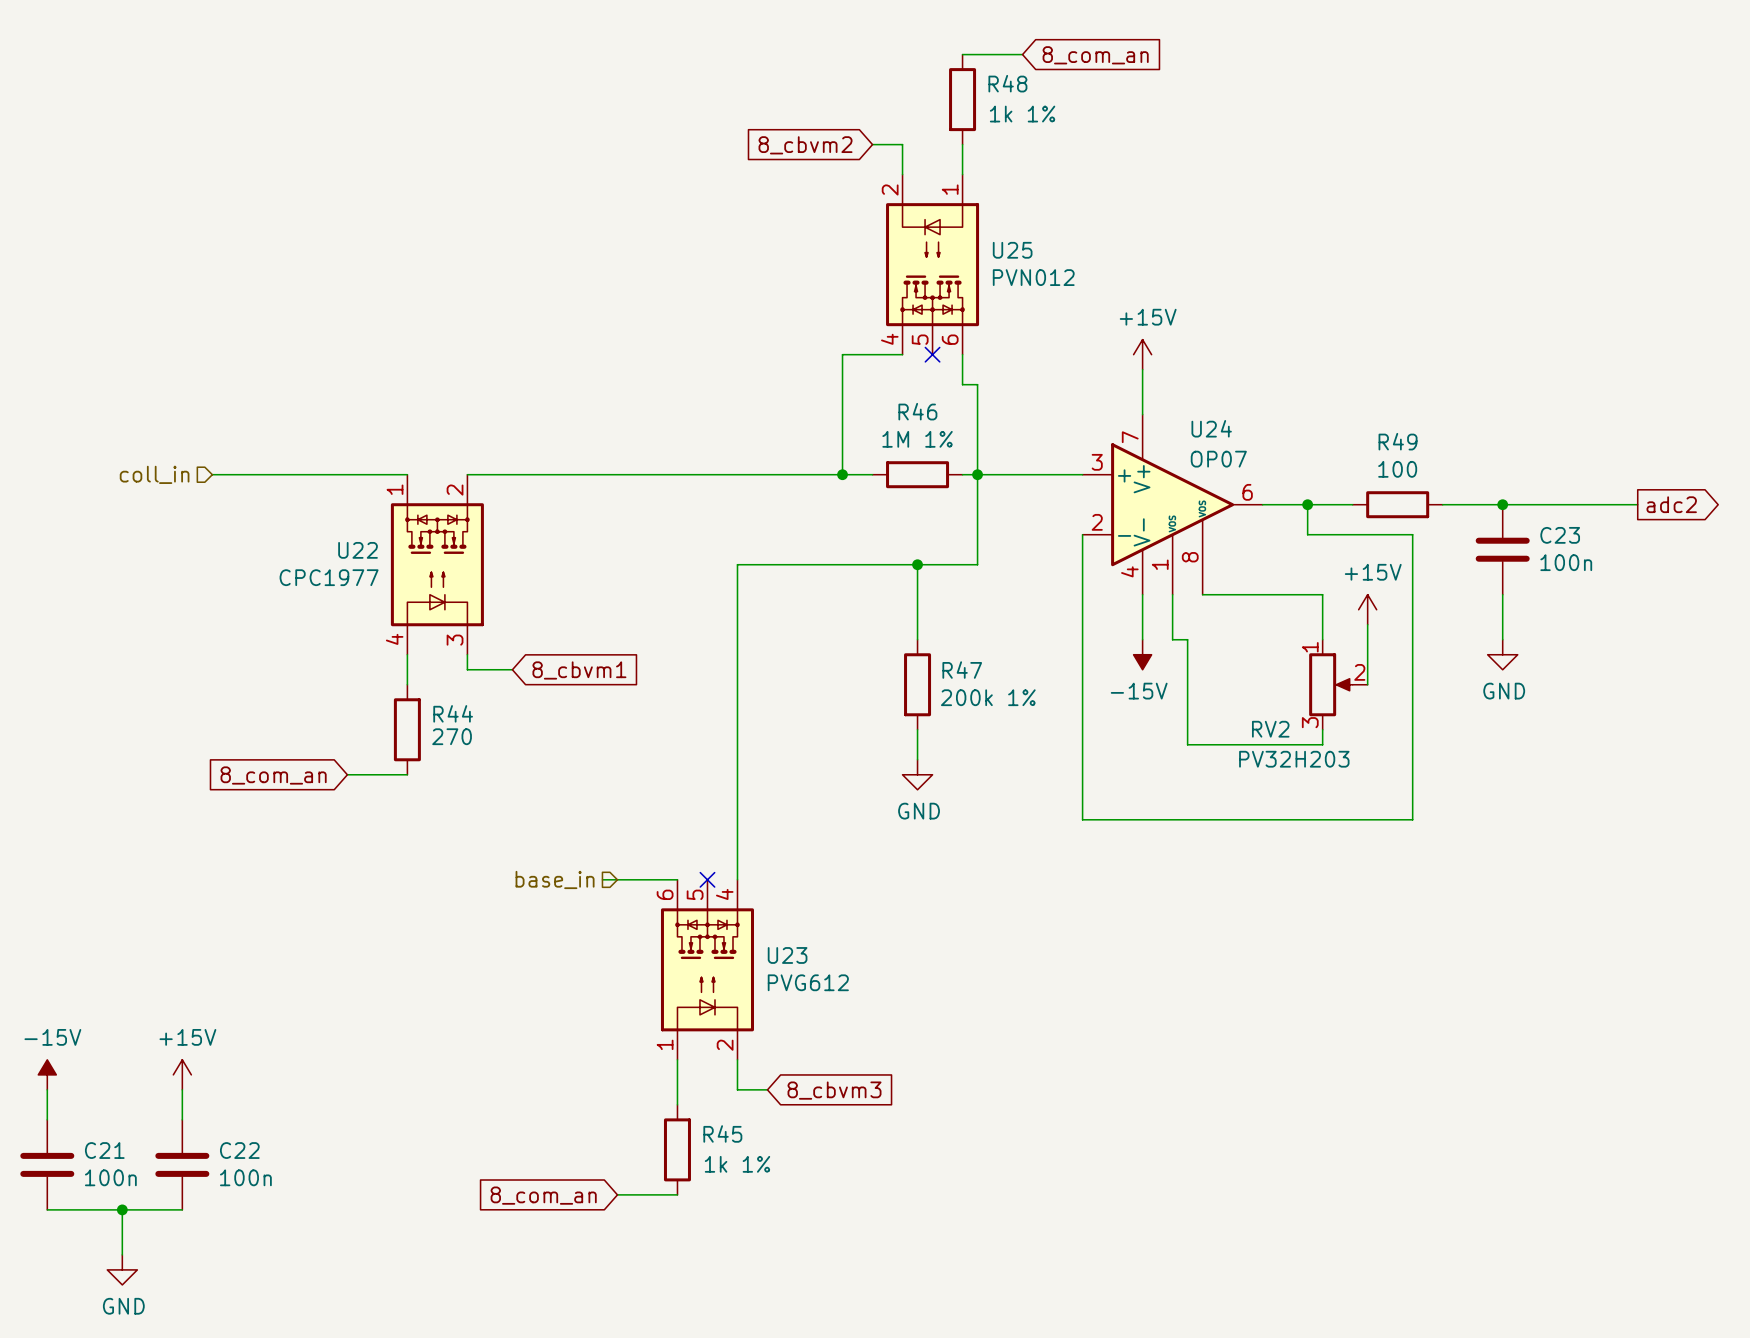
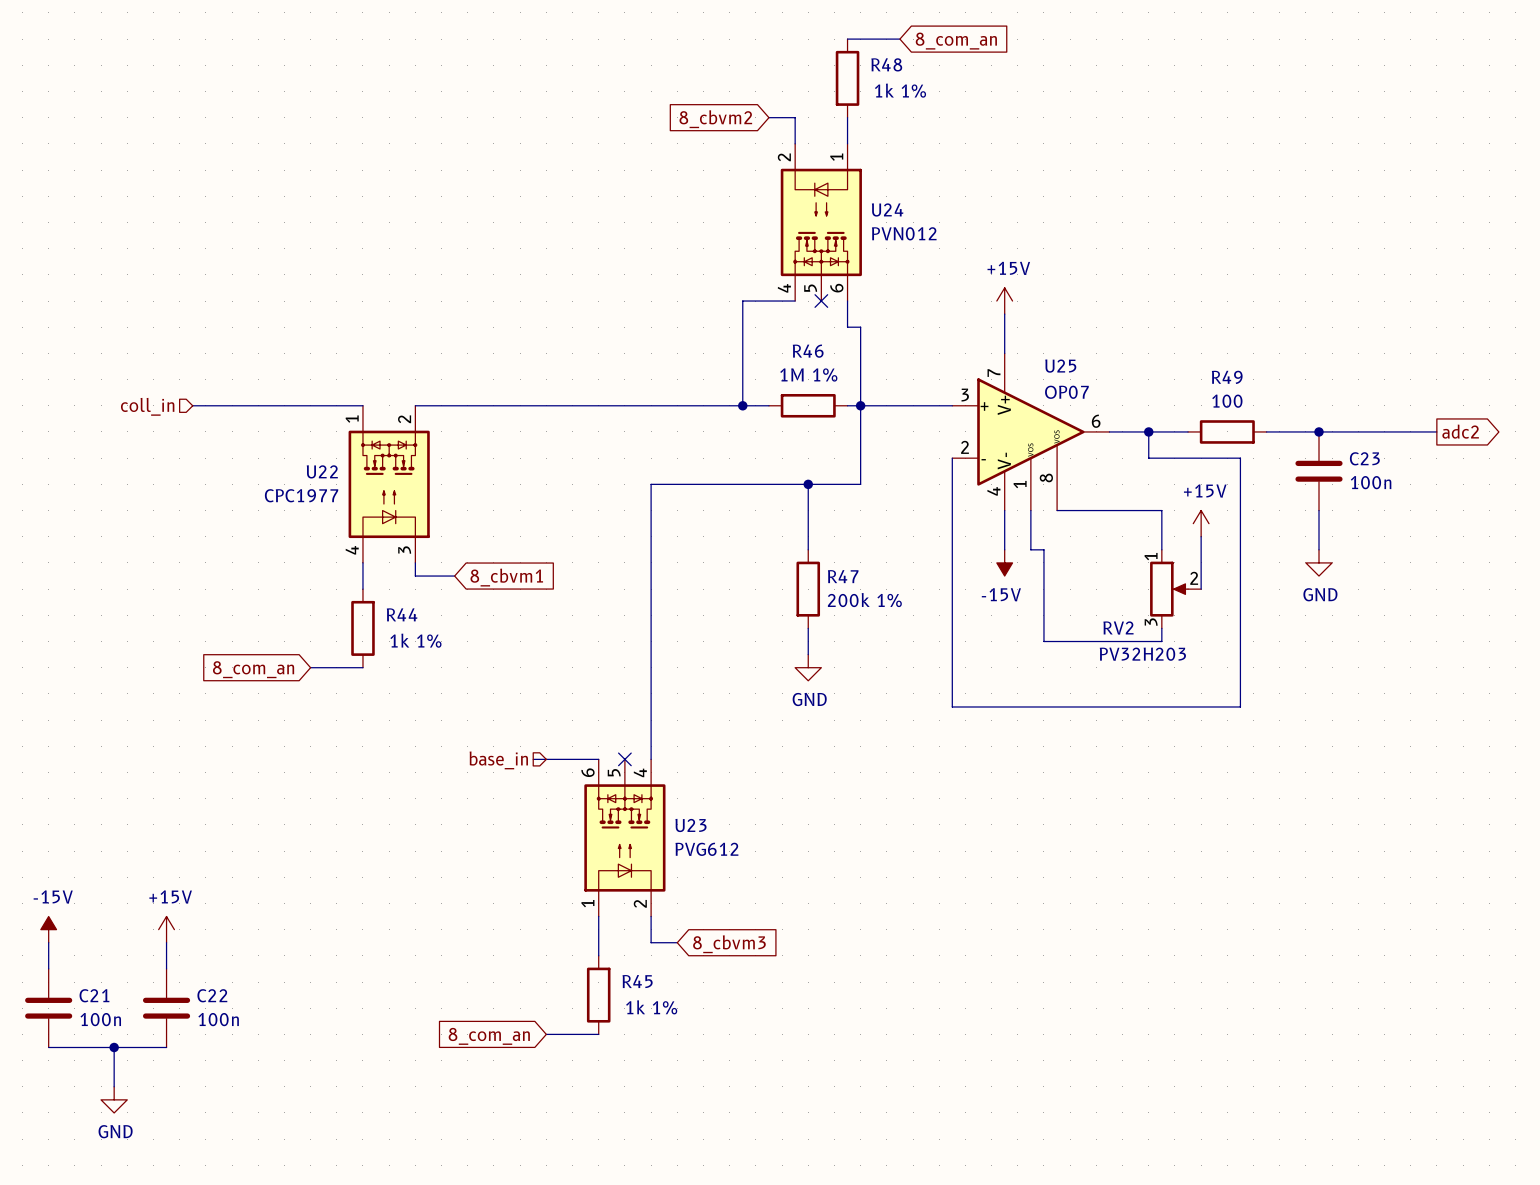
U25 name: U25 (1012, 250) -> U24 (887, 209)
U24 name: U24 (1211, 428) -> U25 (1060, 366)
R44 value: 270 (452, 736) -> 1k 1% (415, 640)

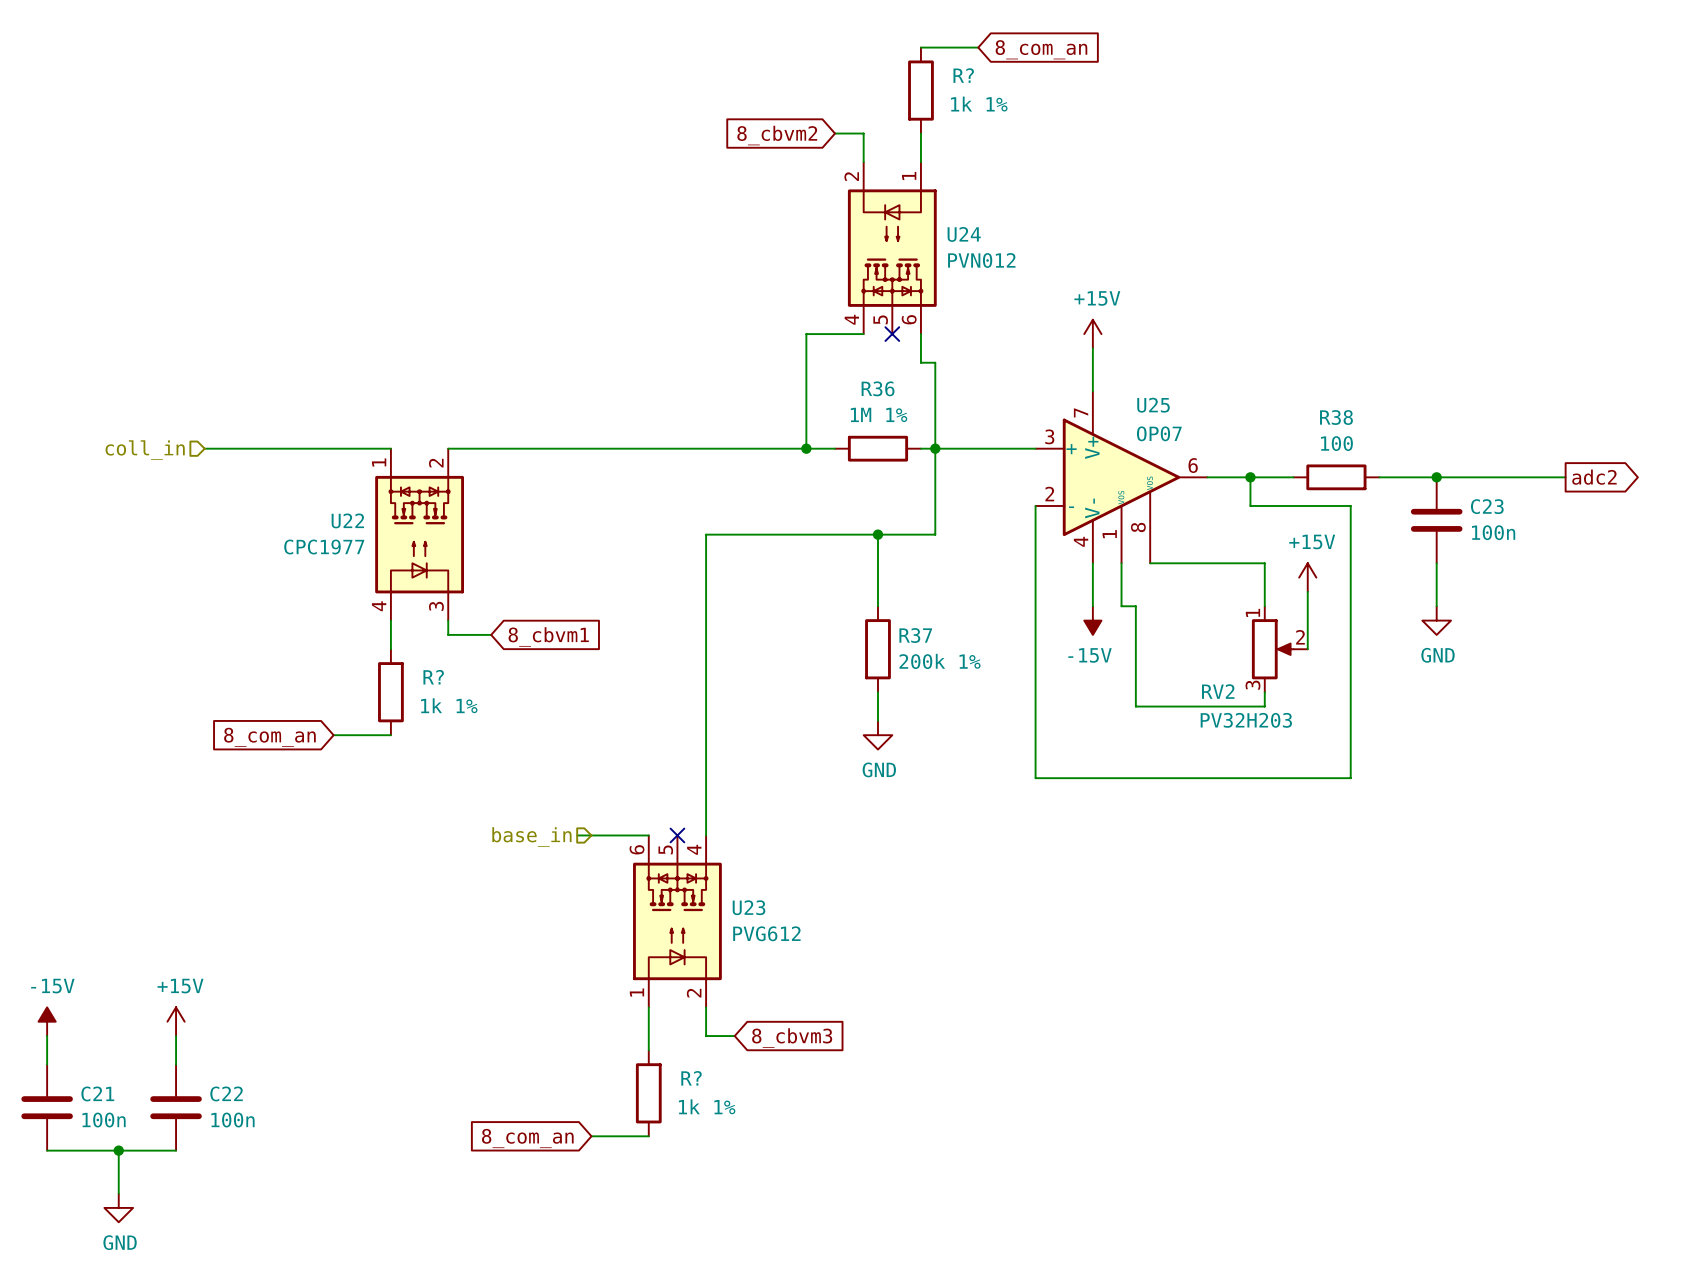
R48 name: R48 (886, 64) -> R? (963, 75)
R46 name: R46 (808, 351) -> R36 (878, 388)
R49 name: R49 (1227, 377) -> R38 (1336, 417)
R47 name: R47 (843, 576) -> R37 (915, 635)
R44 name: R44 (402, 614) -> R? (433, 677)
R45 name: R45 (637, 981) -> R? (691, 1078)

